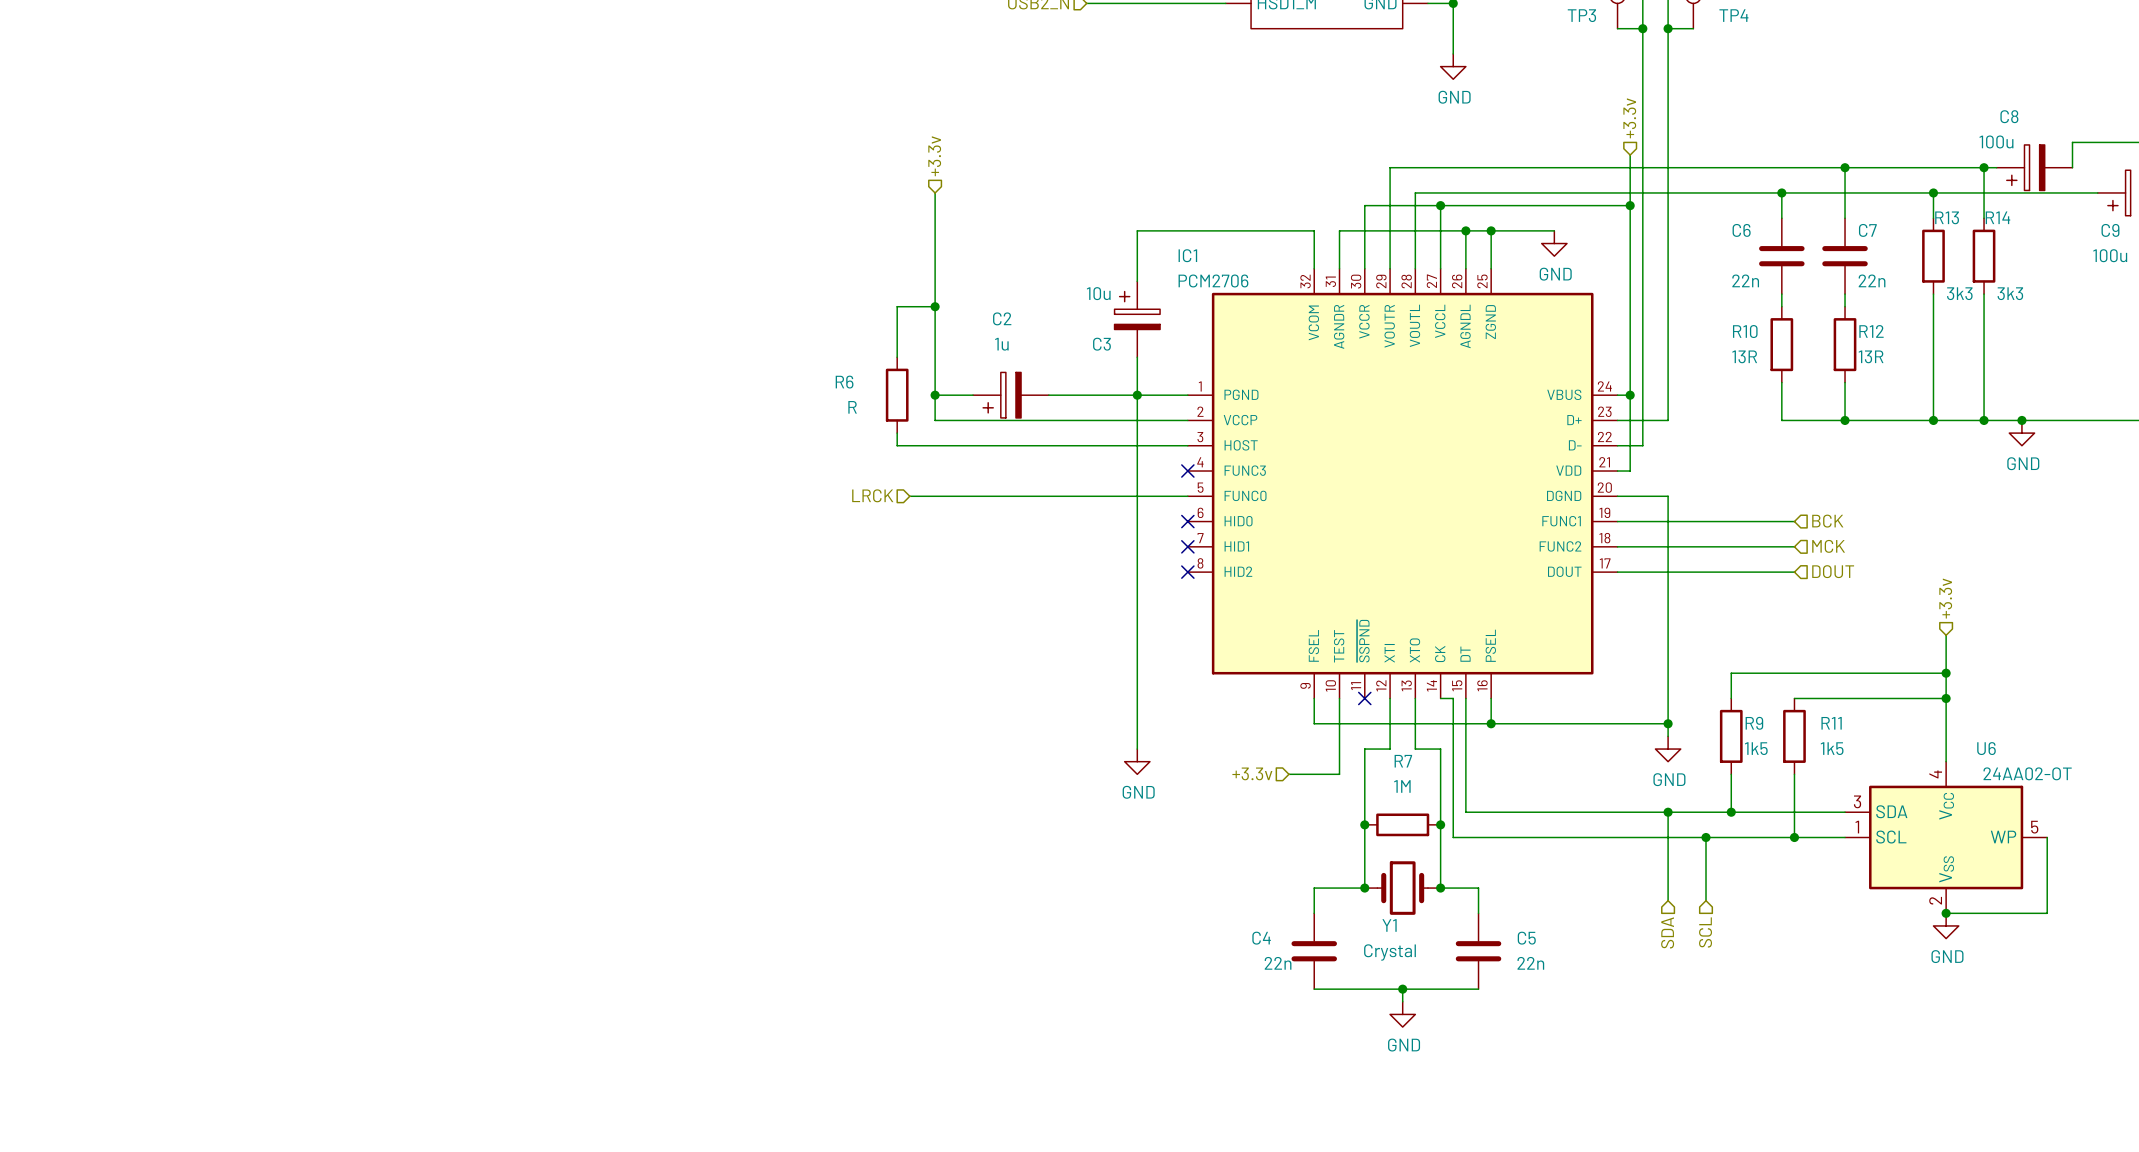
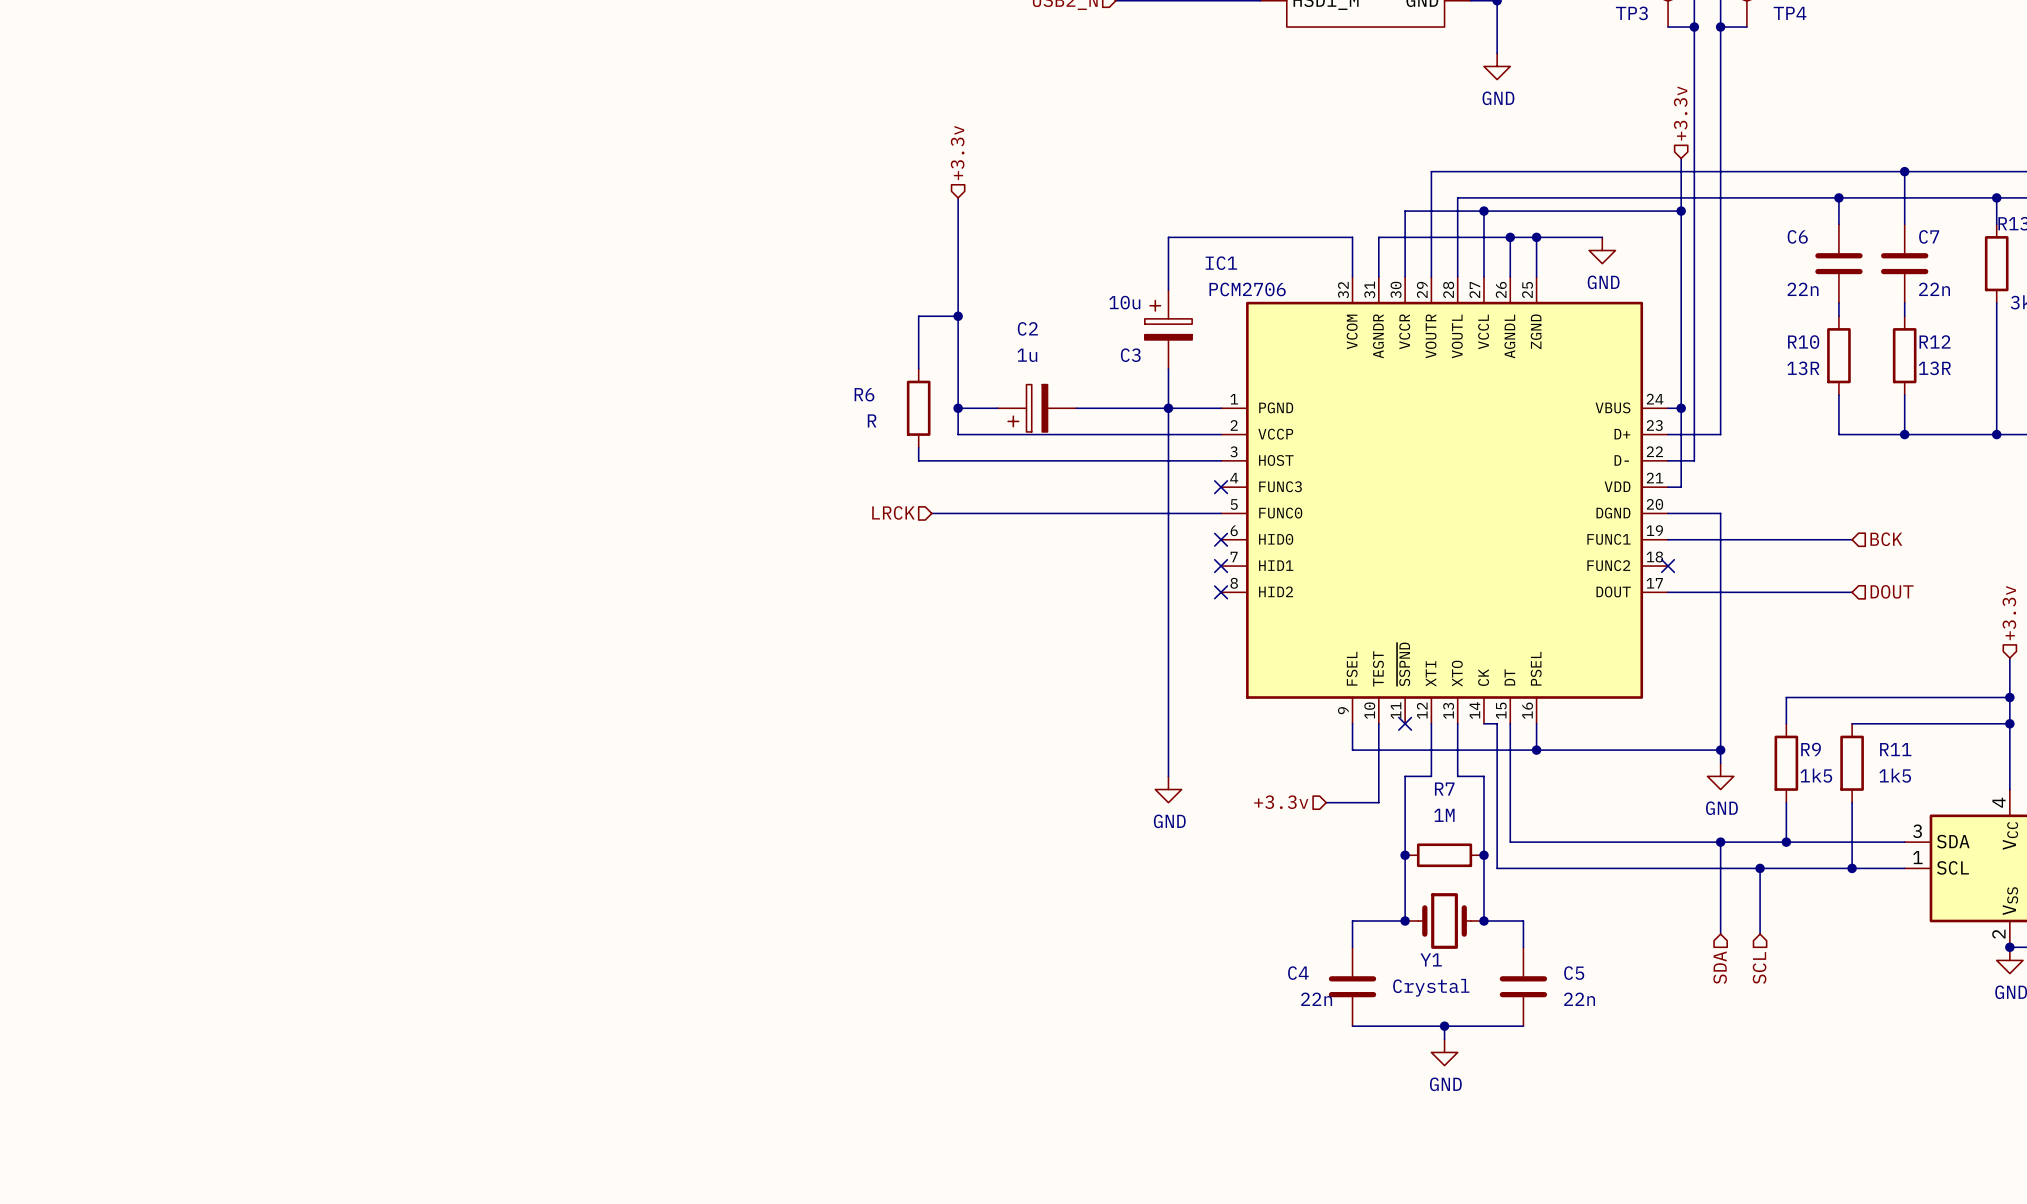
wire: (1617, 546) (1794, 546) -> none
no-connect mark: none -> (1668, 566)
hierarchical label: MCK (1828, 546) -> none

